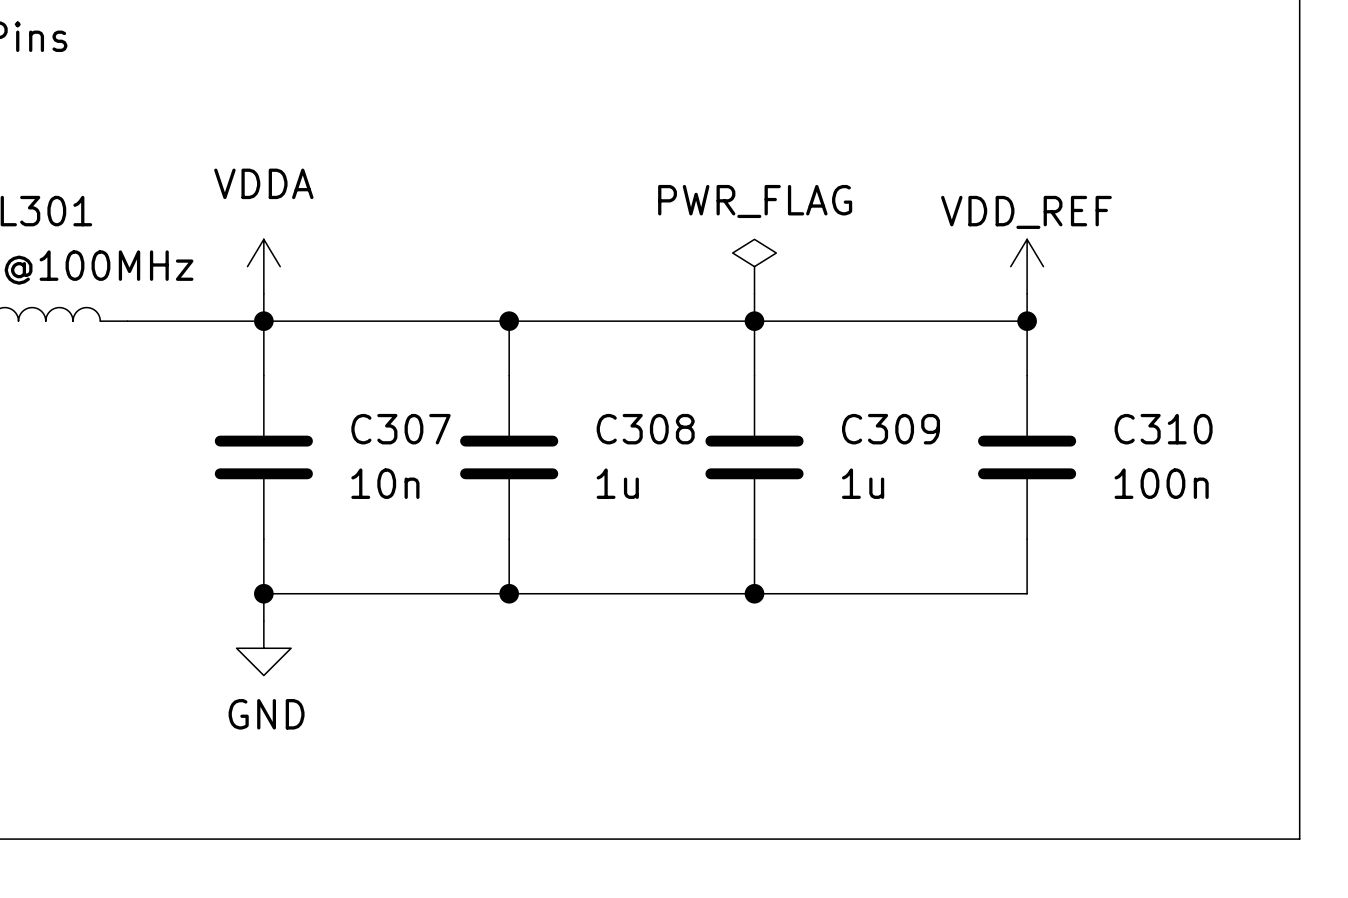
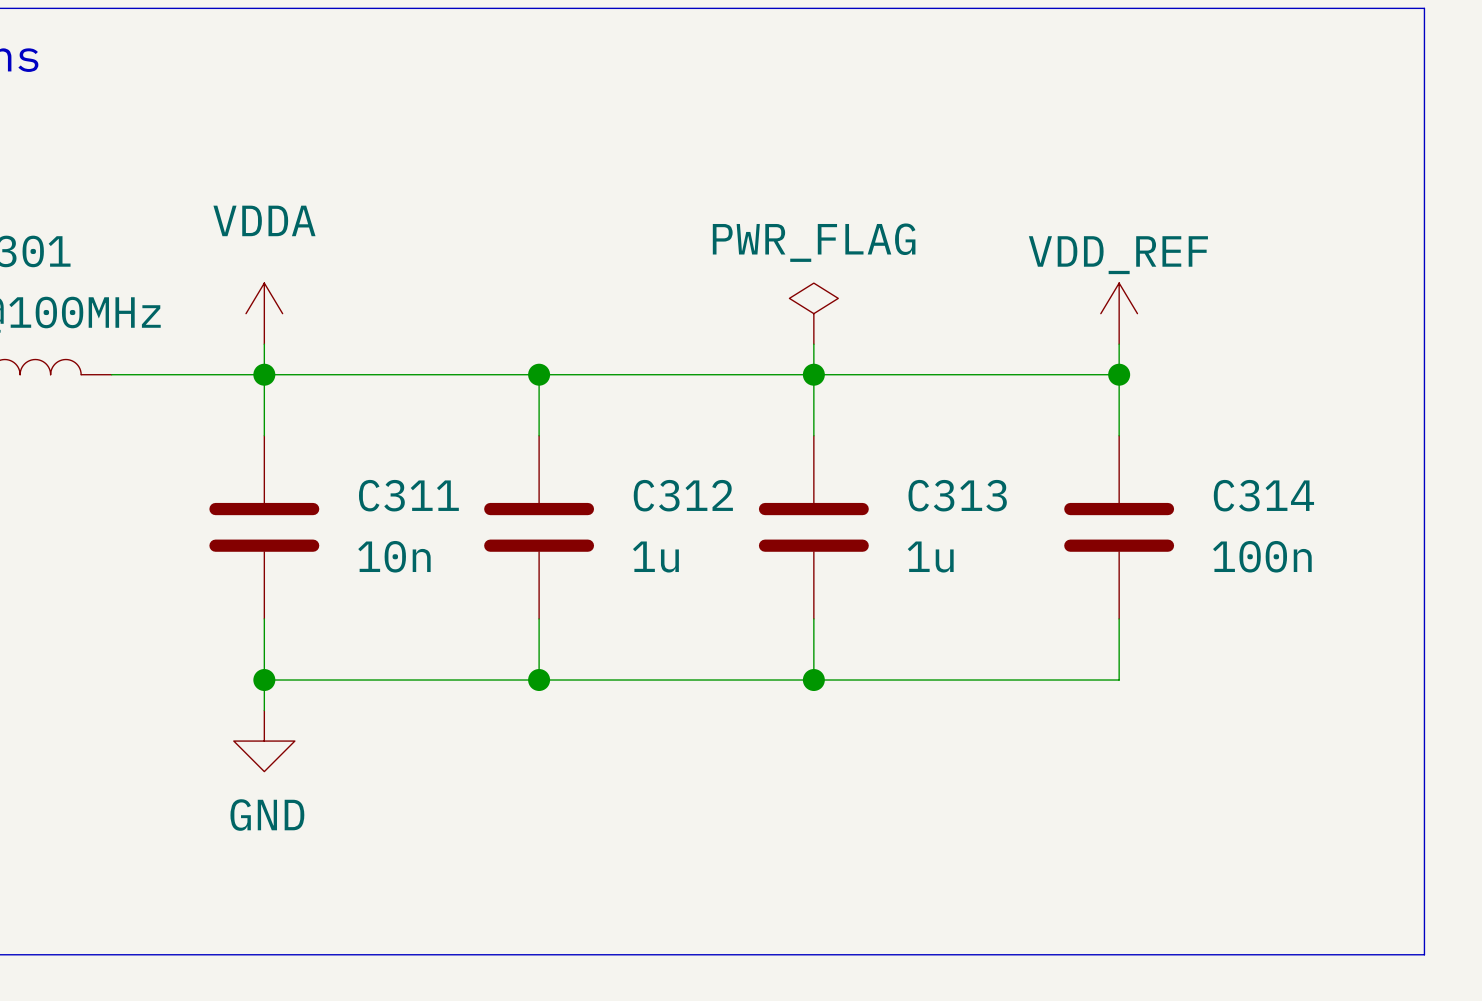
C307 name: C307 (400, 429) -> C311 (408, 495)
C308 name: C308 (645, 429) -> C312 (683, 495)
C309 name: C309 (891, 429) -> C313 (957, 495)
C310 name: C310 (1163, 429) -> C314 (1263, 495)

